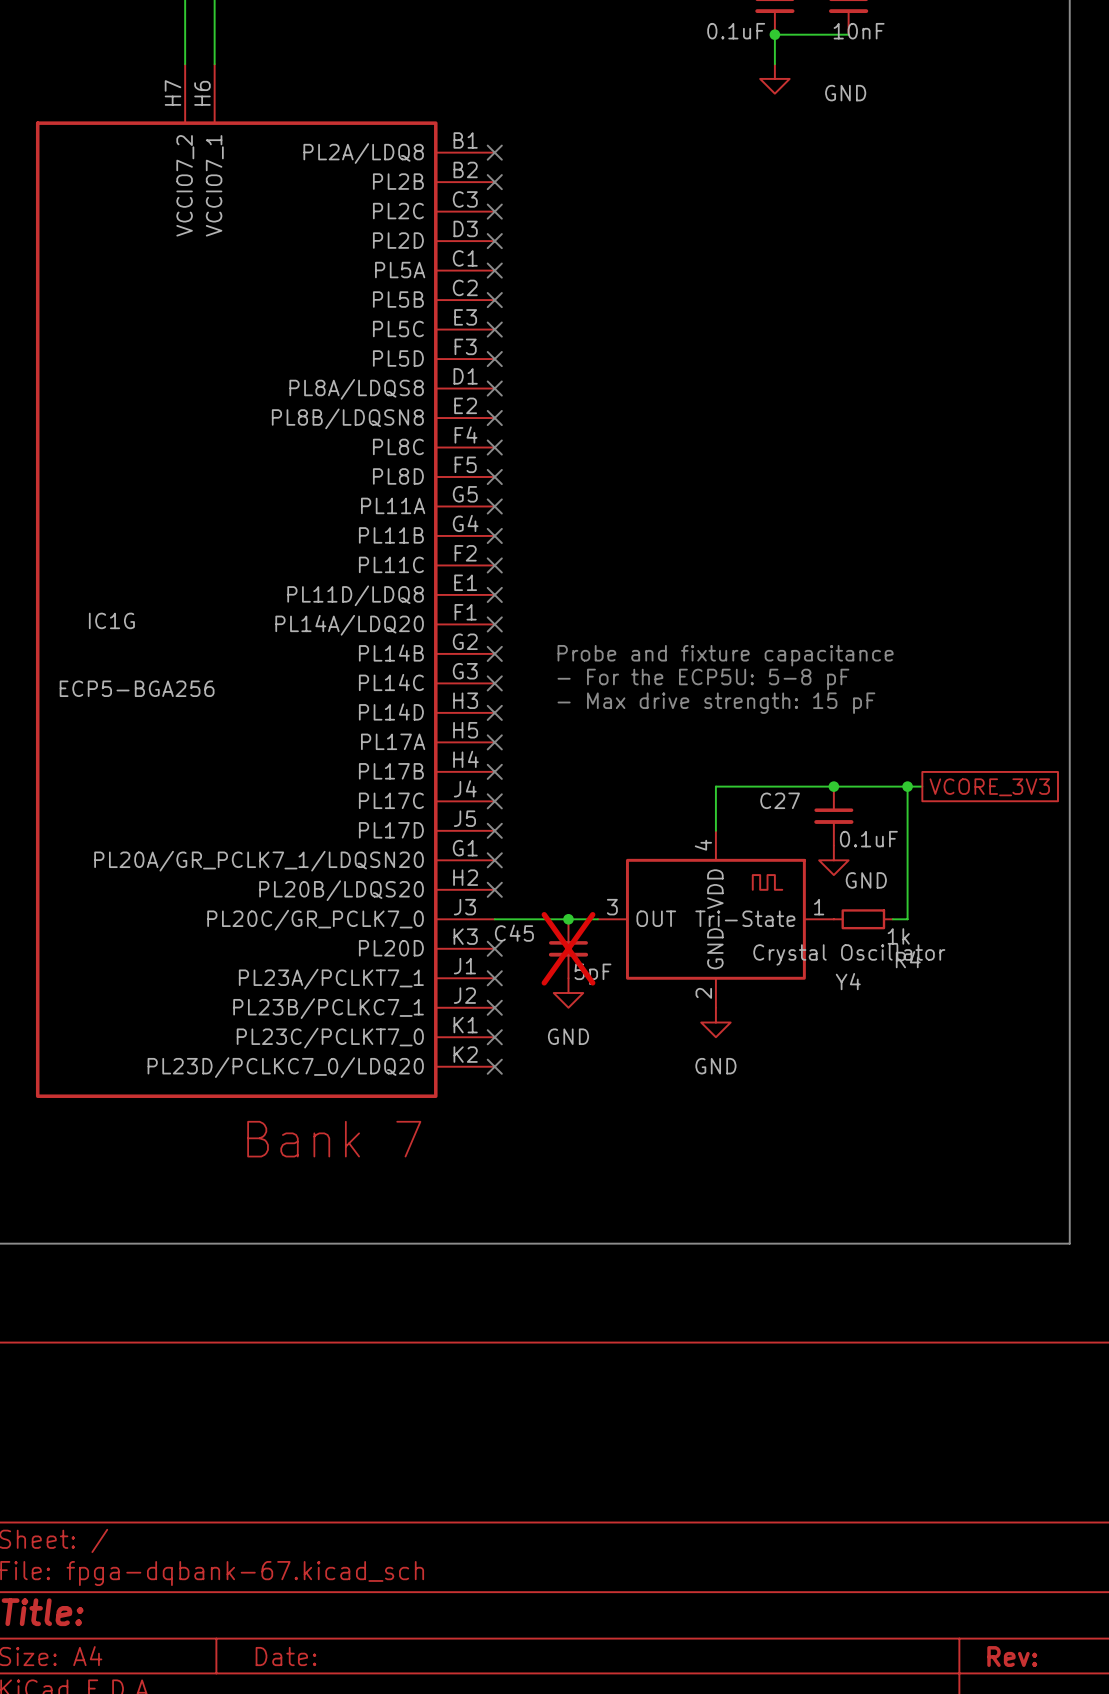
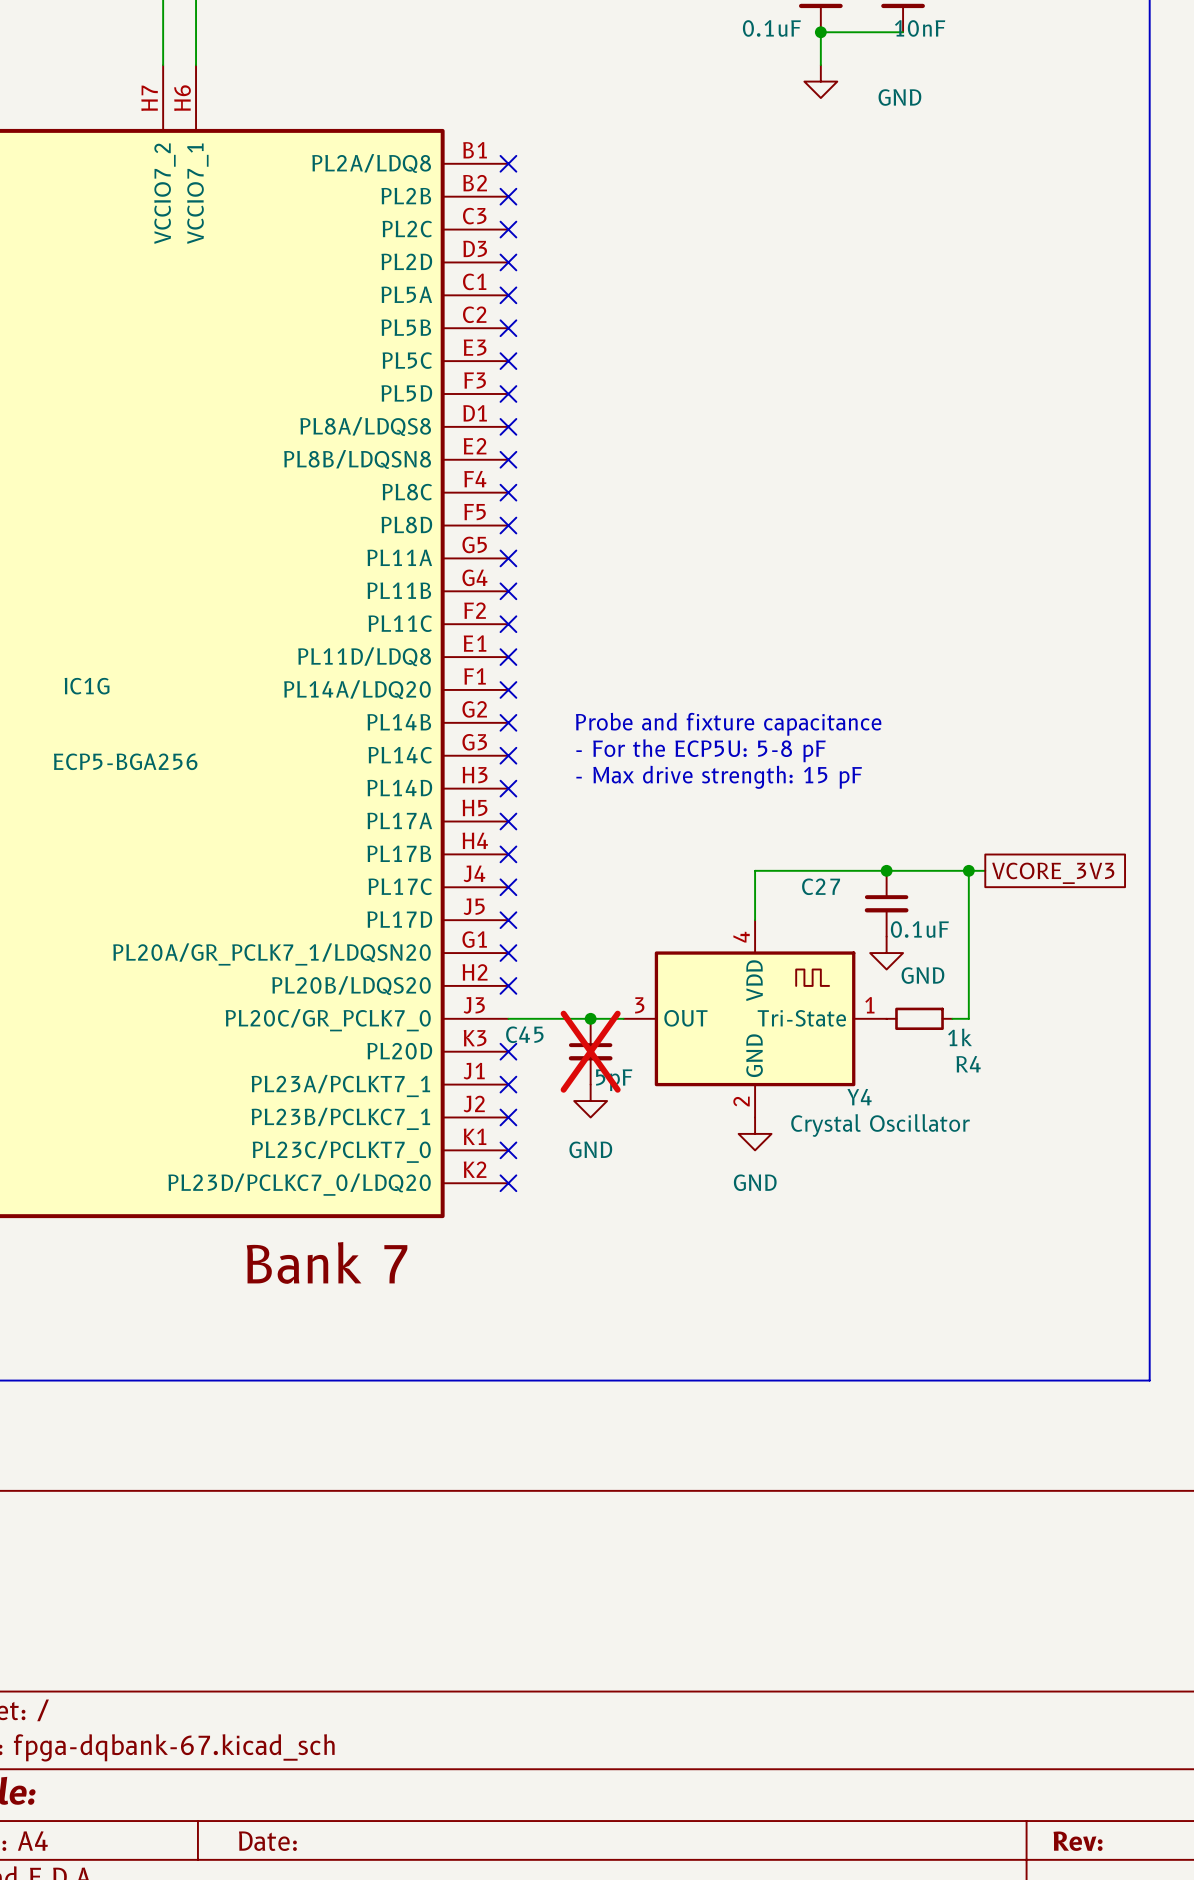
Y4 value position: Crystal Oscillator (849, 954) -> Crystal Oscillator (880, 1125)
Y4 name position: Y4 (848, 981) -> Y4 (859, 1097)

